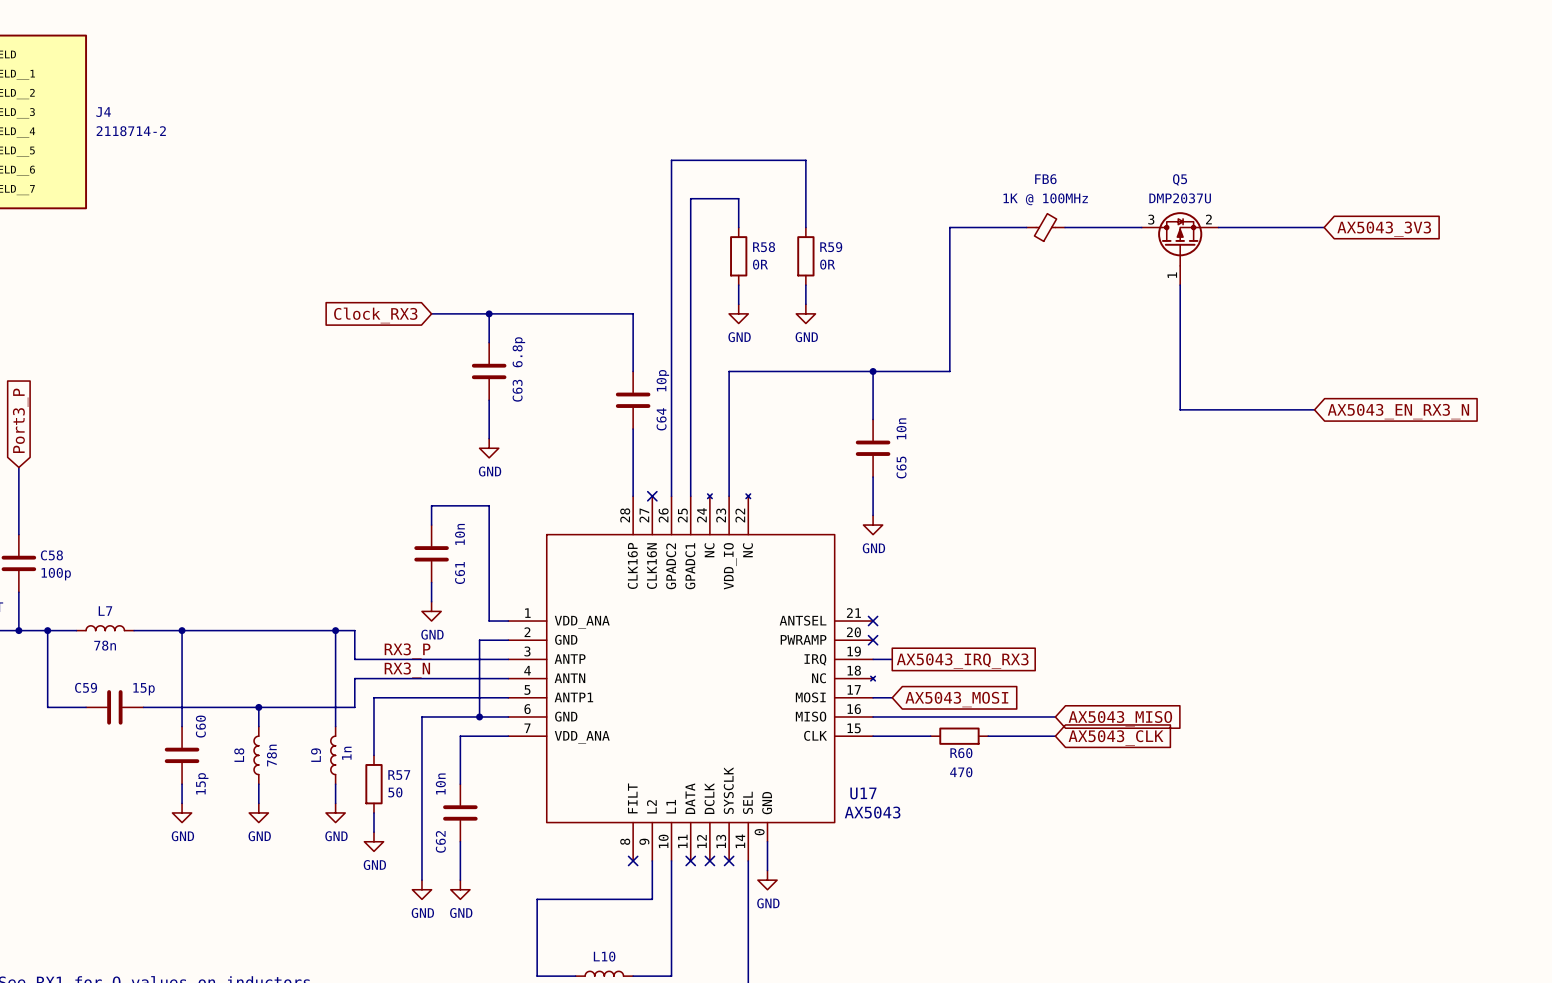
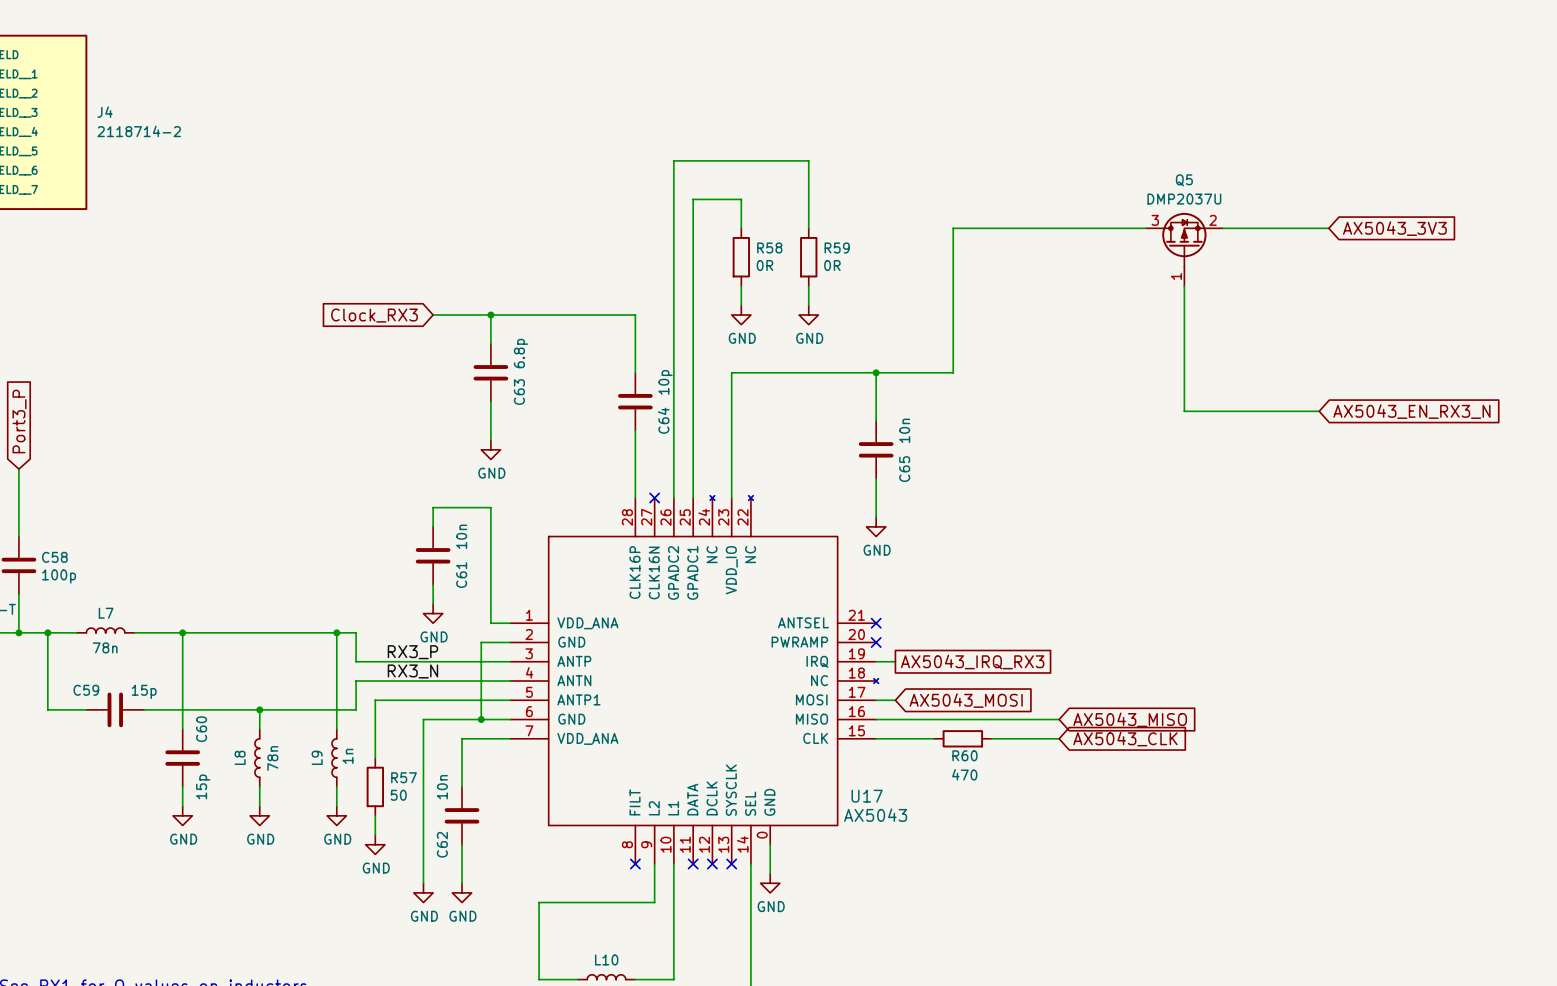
FB6: 1K @ 100MHz (1045, 227) -> none

